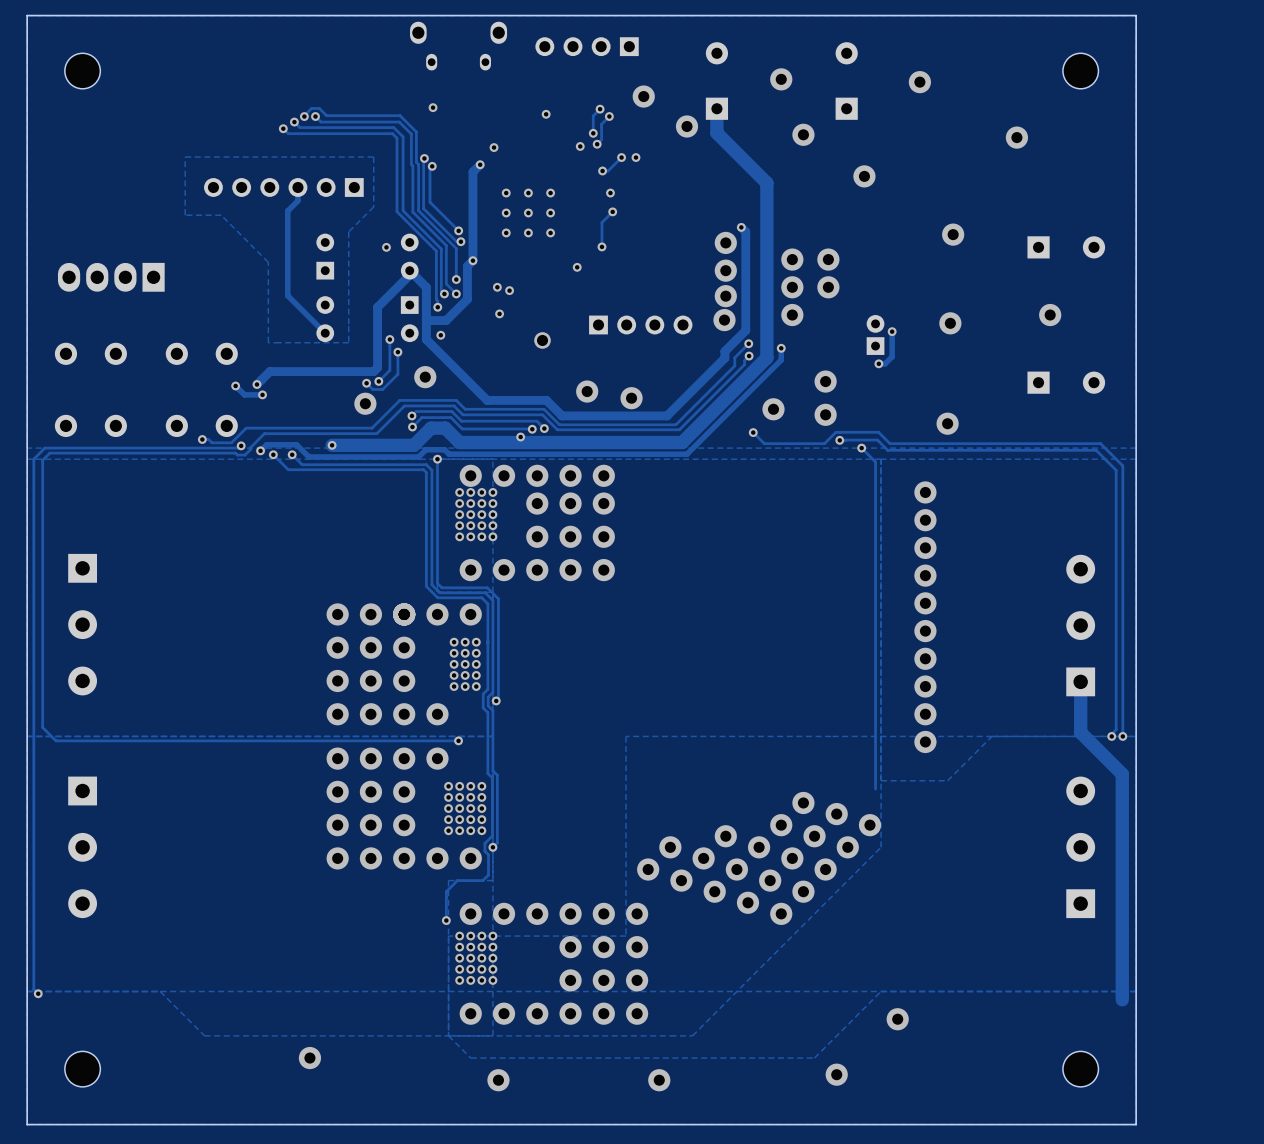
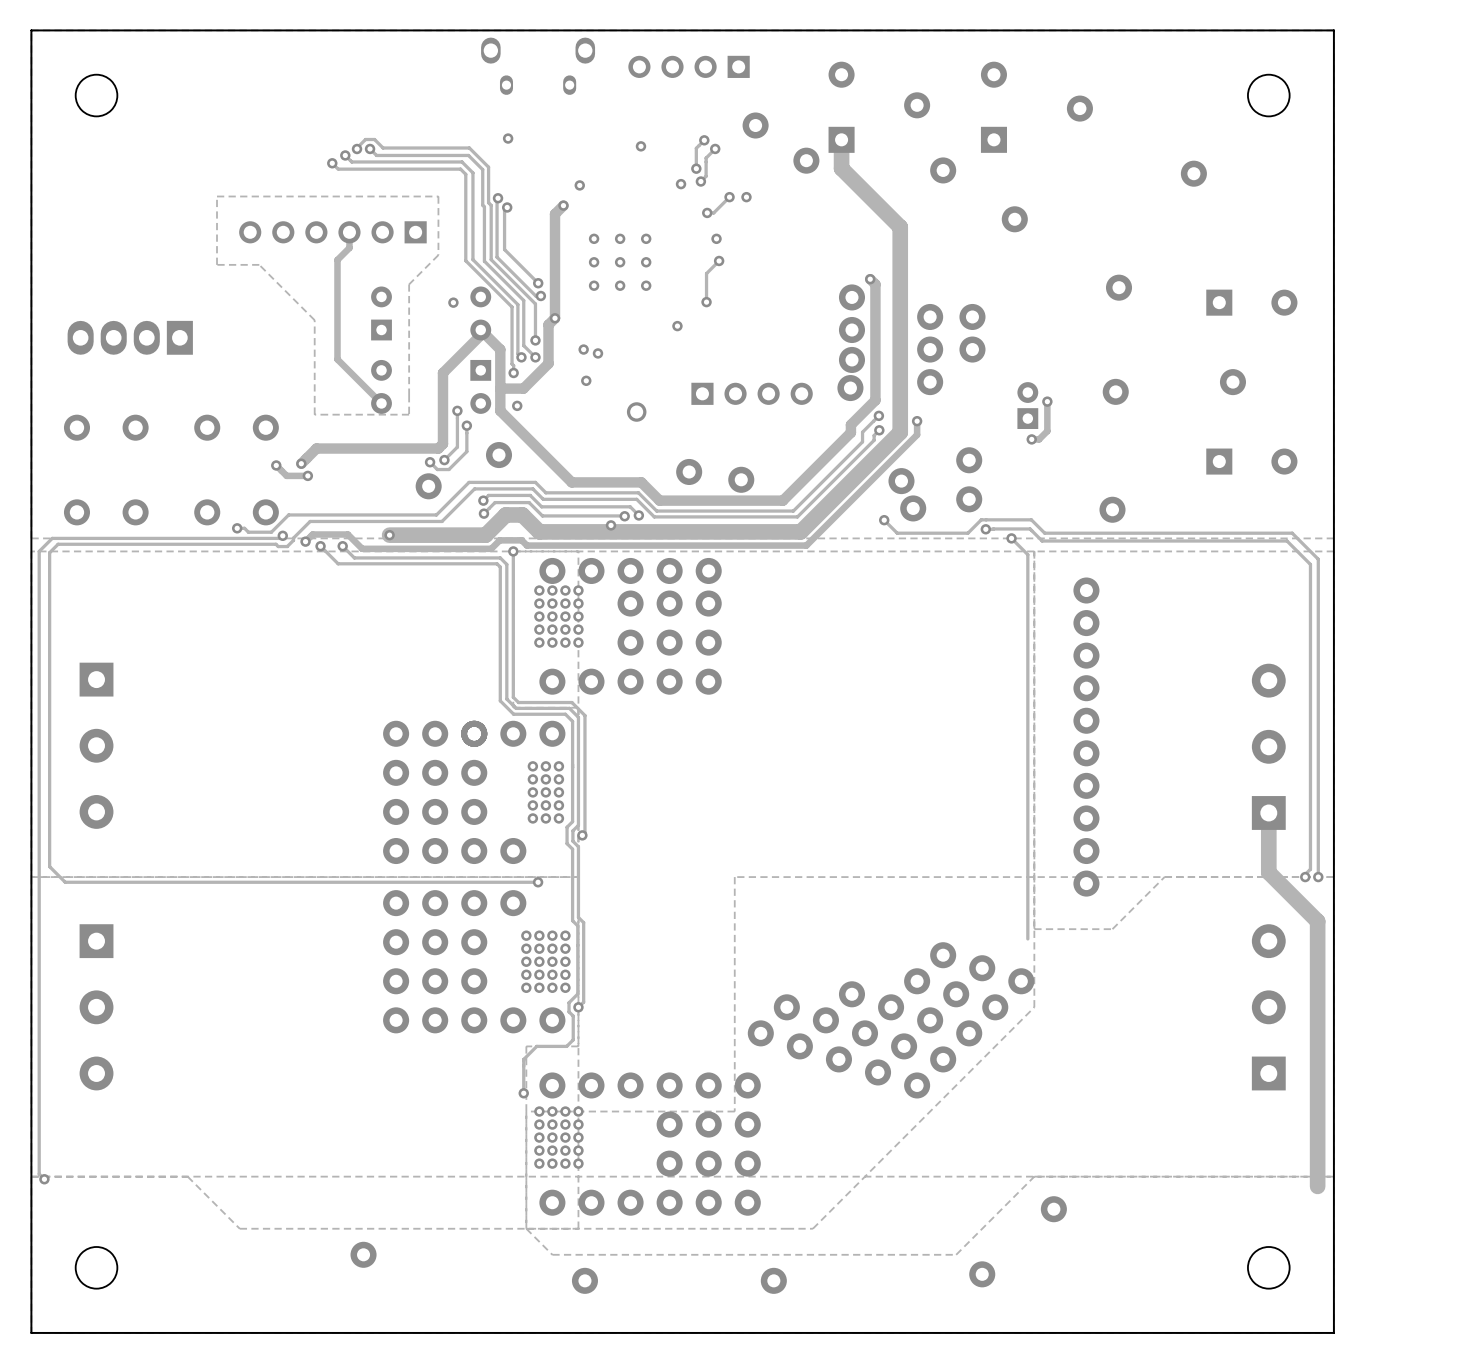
via: none -> (901, 481)
via: (773, 409) -> none
via: none -> (913, 508)

